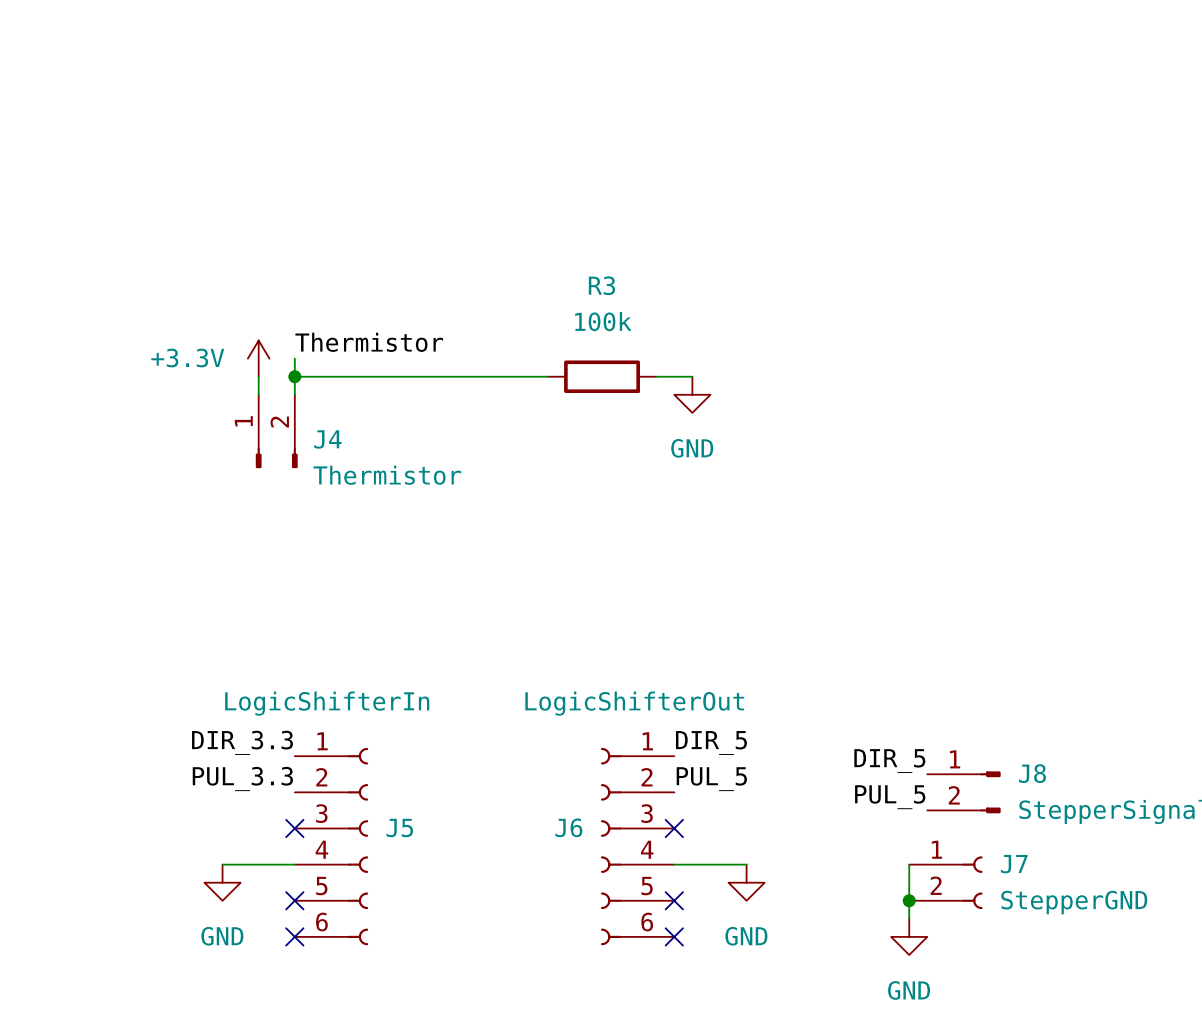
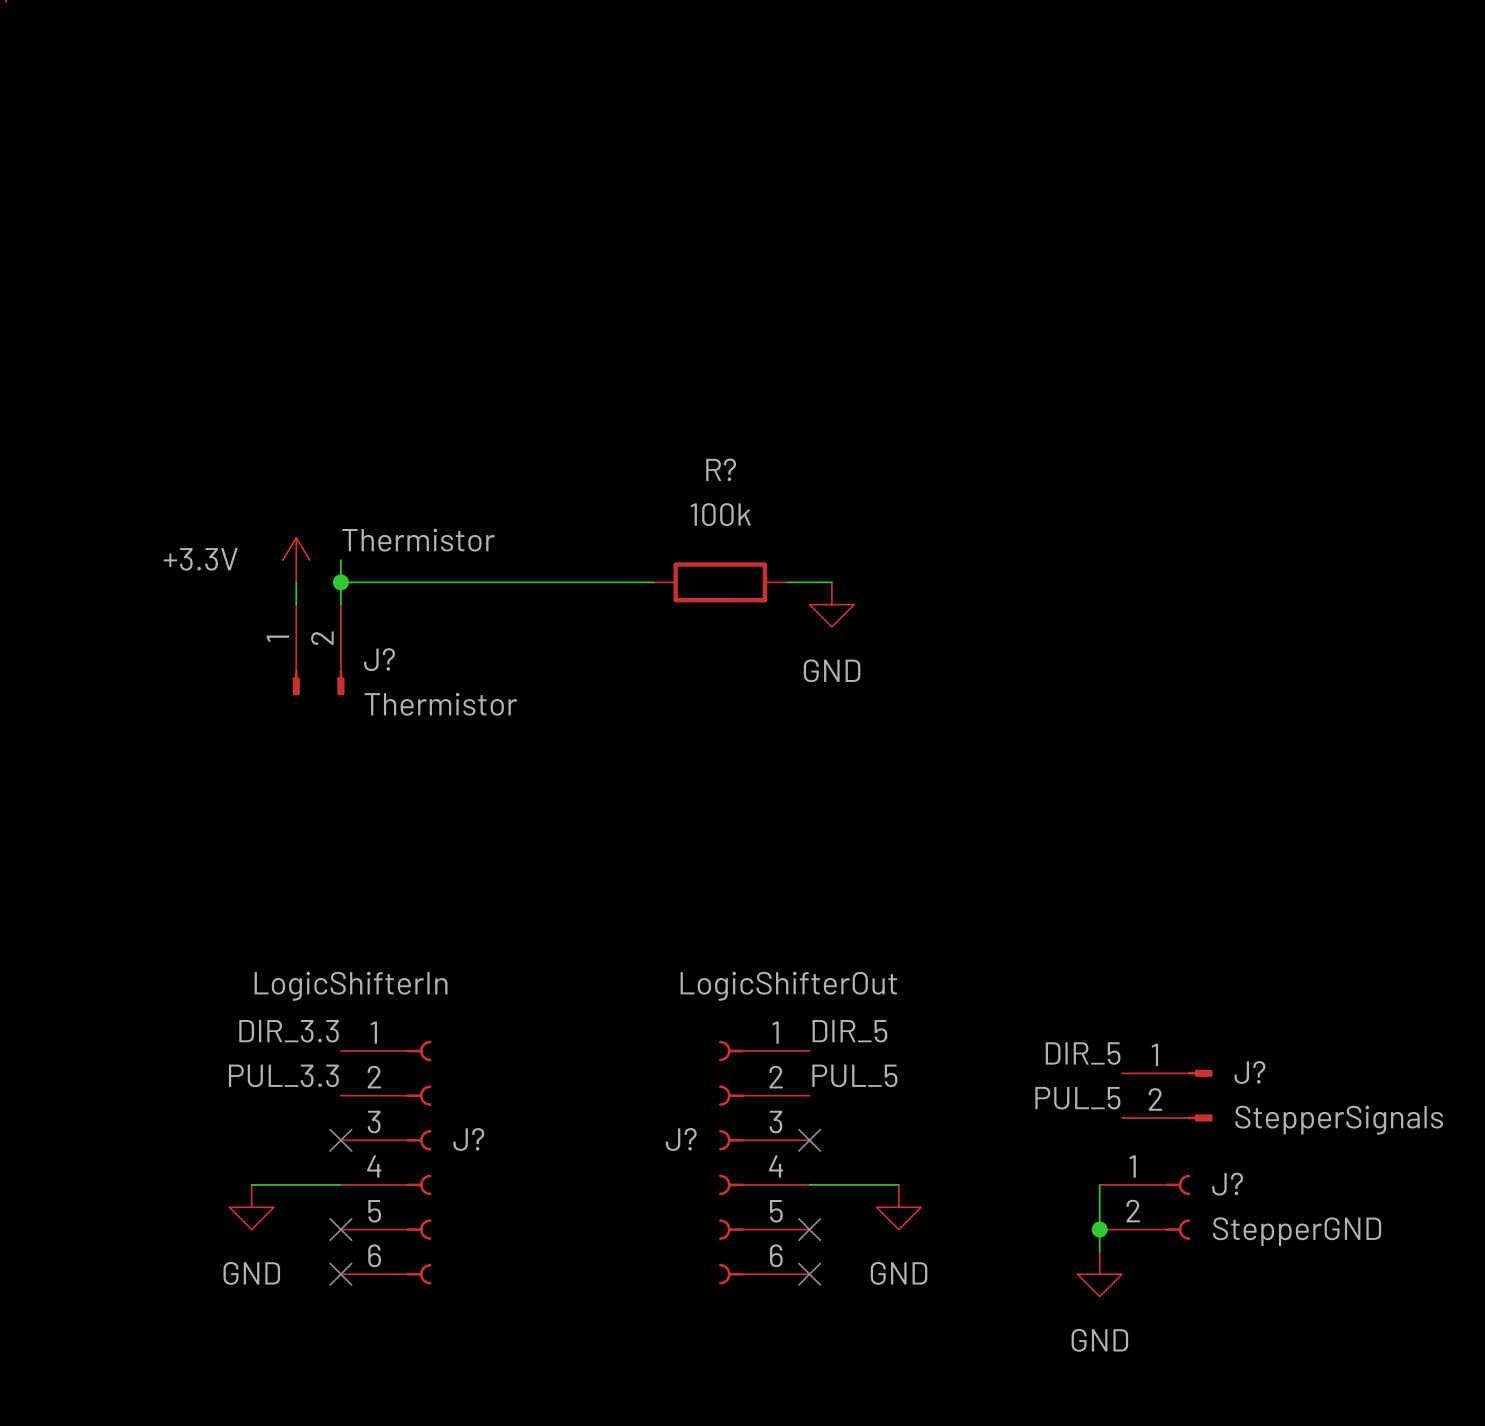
R3 name: R3 (601, 285) -> R? (721, 469)
J4 name: J4 (327, 439) -> J? (379, 659)
J8 name: J8 (1032, 773) -> J? (1249, 1072)
J5 name: J5 (399, 827) -> J? (468, 1139)
J6 name: J6 (568, 827) -> J? (681, 1139)
J7 name: J7 (1014, 864) -> J? (1227, 1184)

